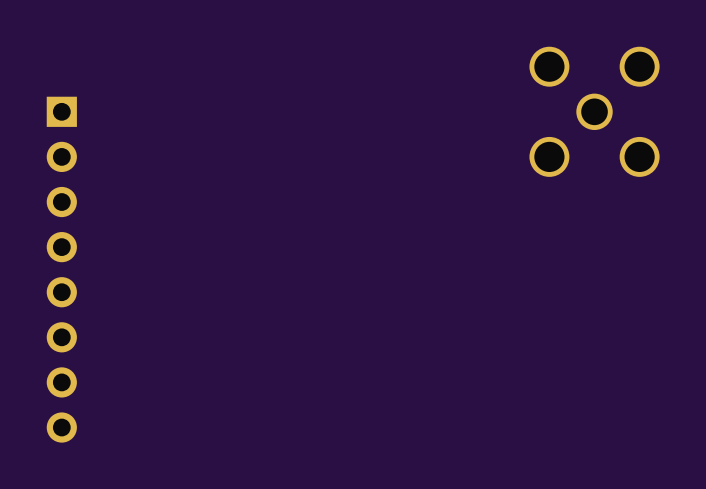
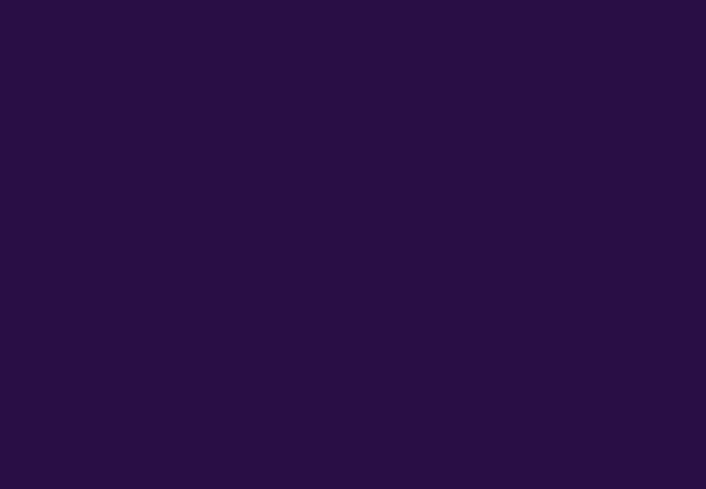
part: (594, 111) -> none
part: (61, 269) -> none

